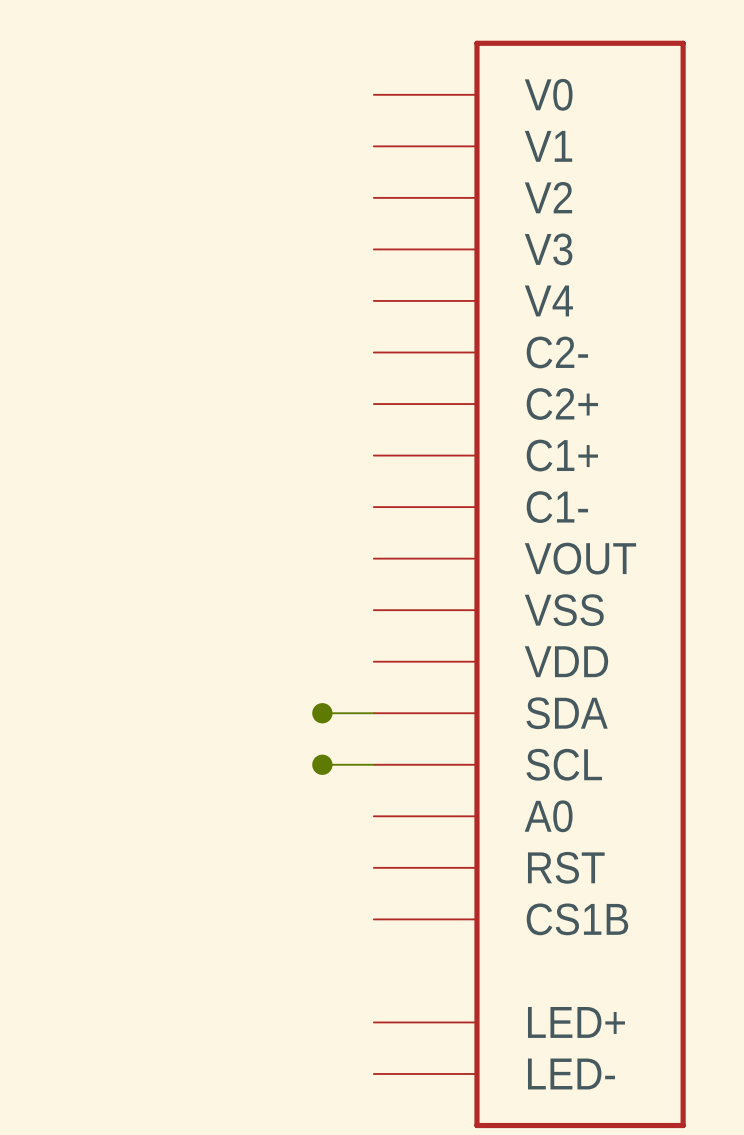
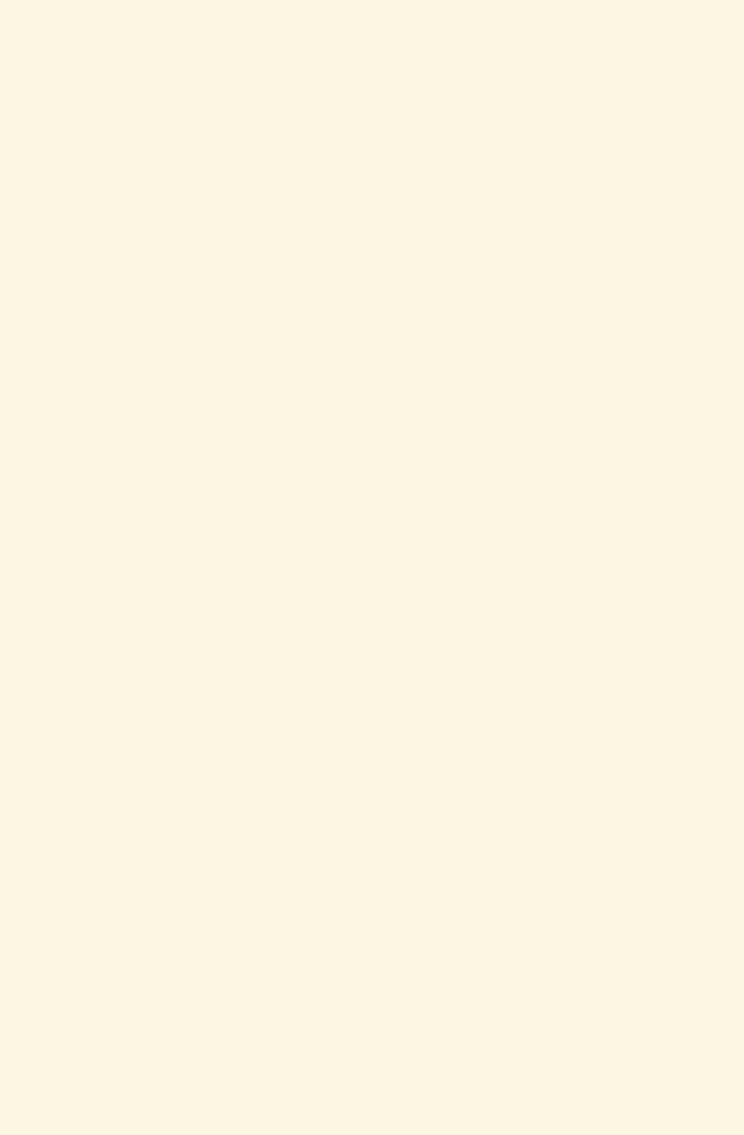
part: (529, 584) -> none
wire: (322, 713) (373, 713) -> none
junction: (322, 713) -> none
wire: (322, 764) (373, 764) -> none
junction: (322, 764) -> none

